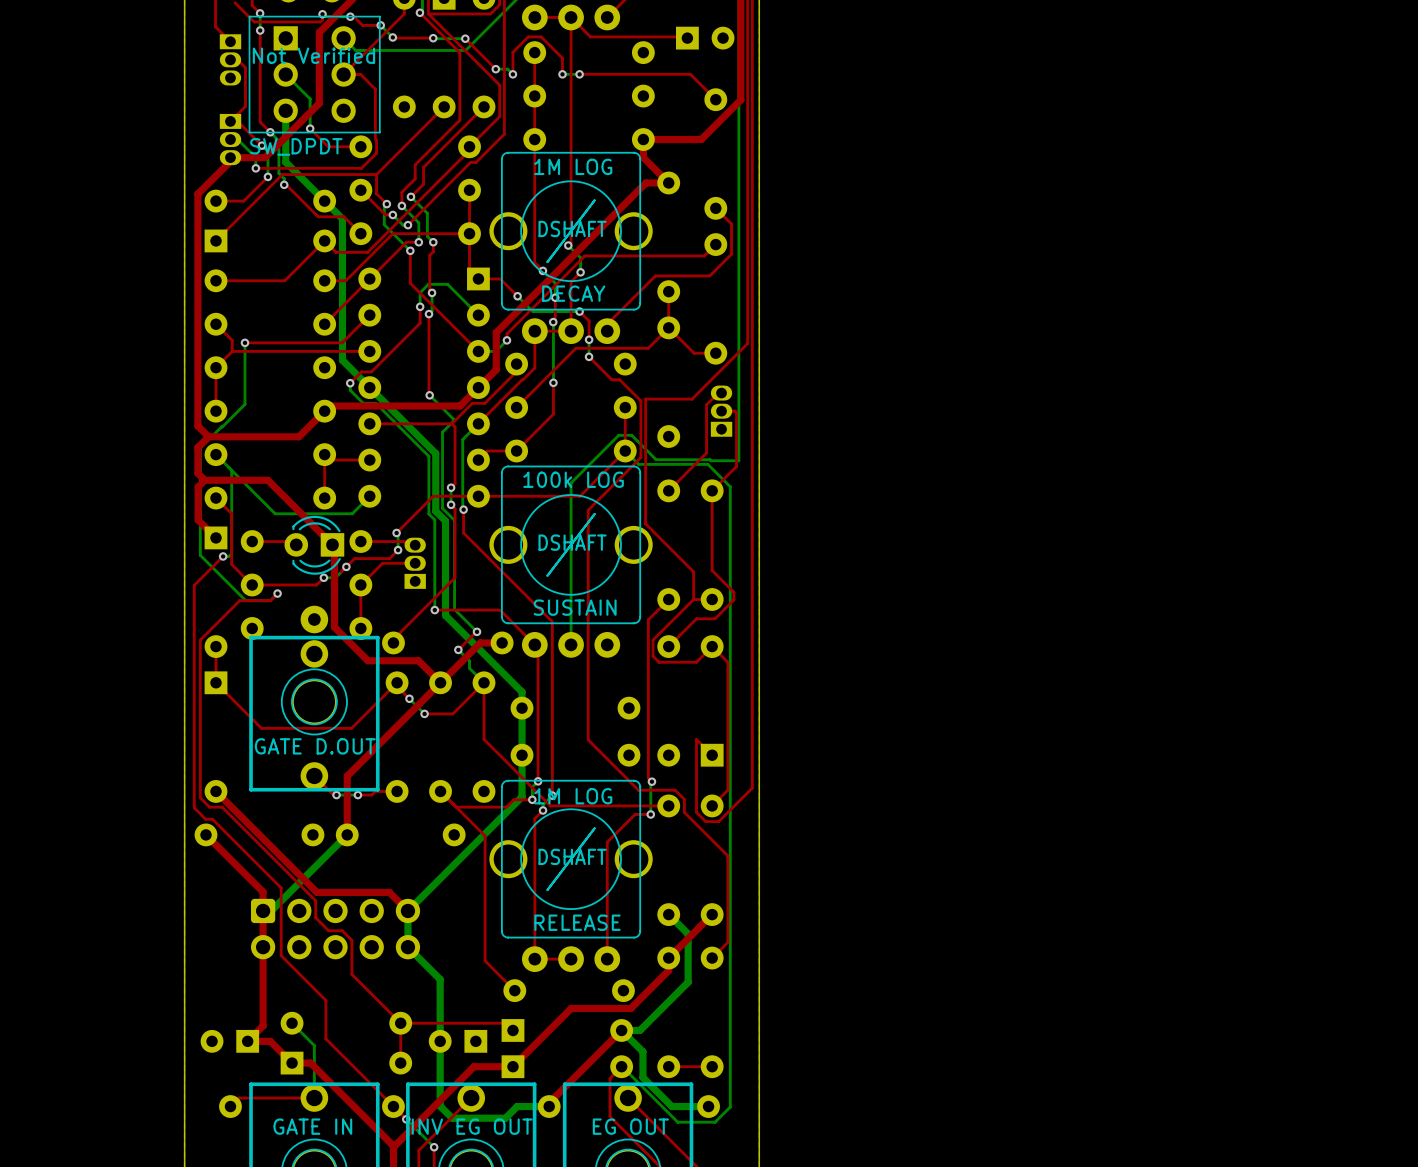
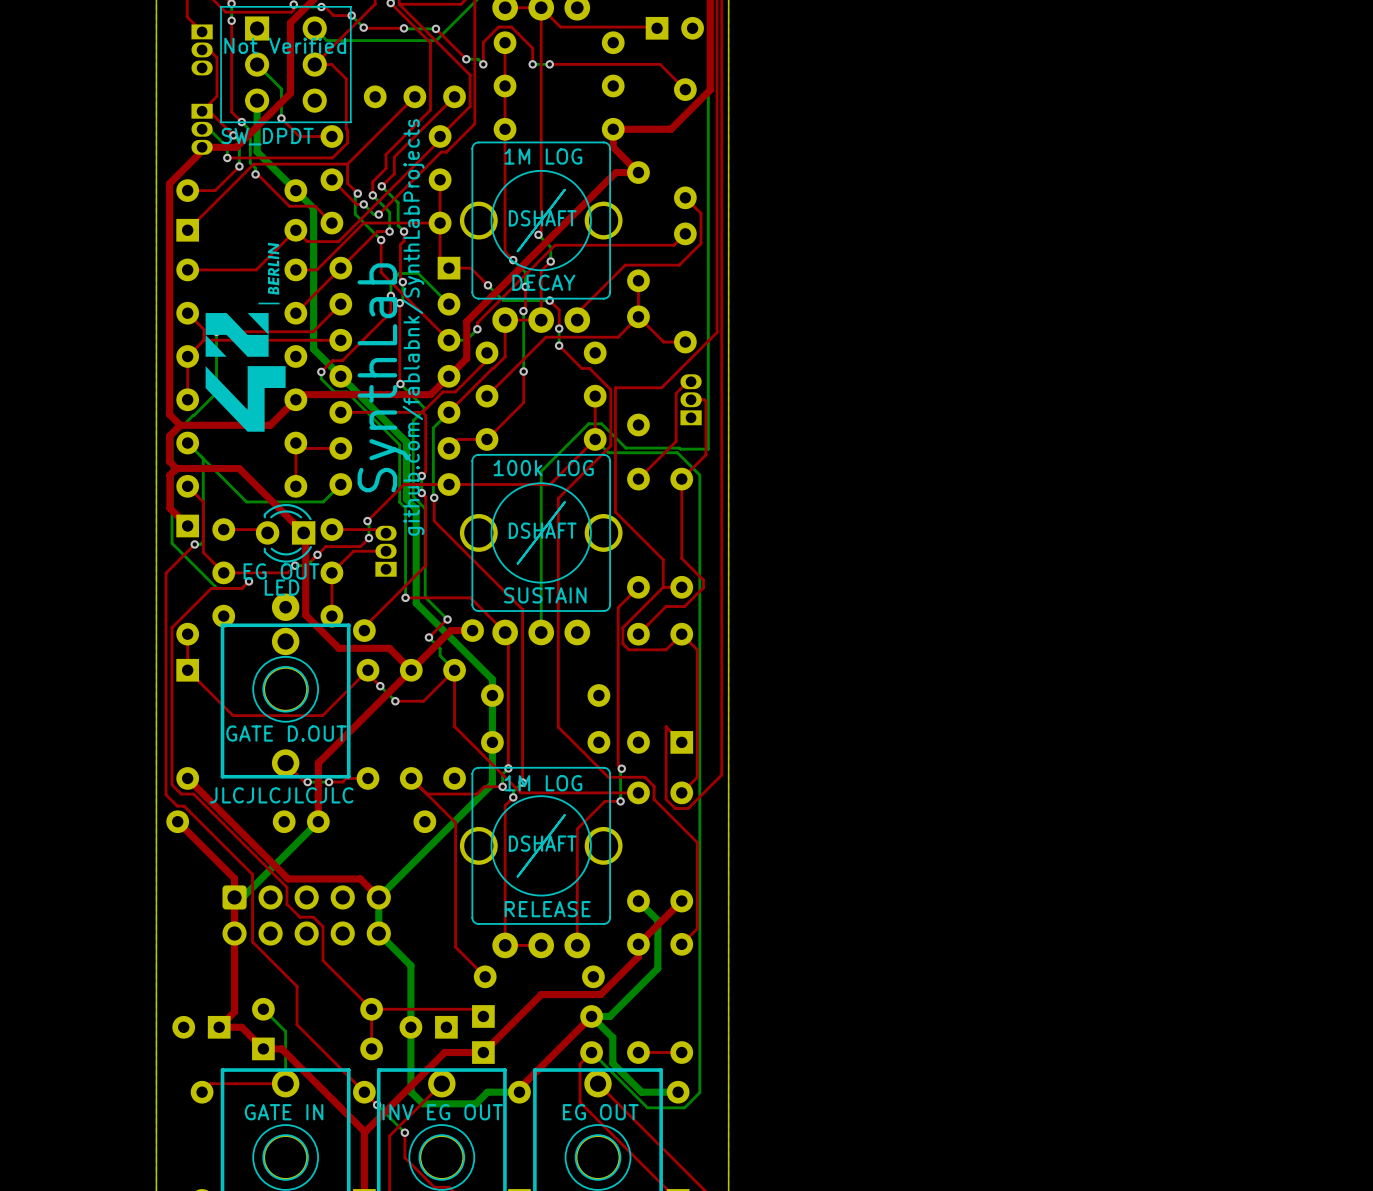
drawing: none -> [205, 242, 286, 432]
text: none -> github.com/fablabnk/SynthLabProjects (413, 327)
text: none -> SynthLab (383, 377)
part value: none -> EG OUT (281, 571)
text: none -> LED (282, 587)
text: none -> JLCJLCJLCJLC (281, 795)

